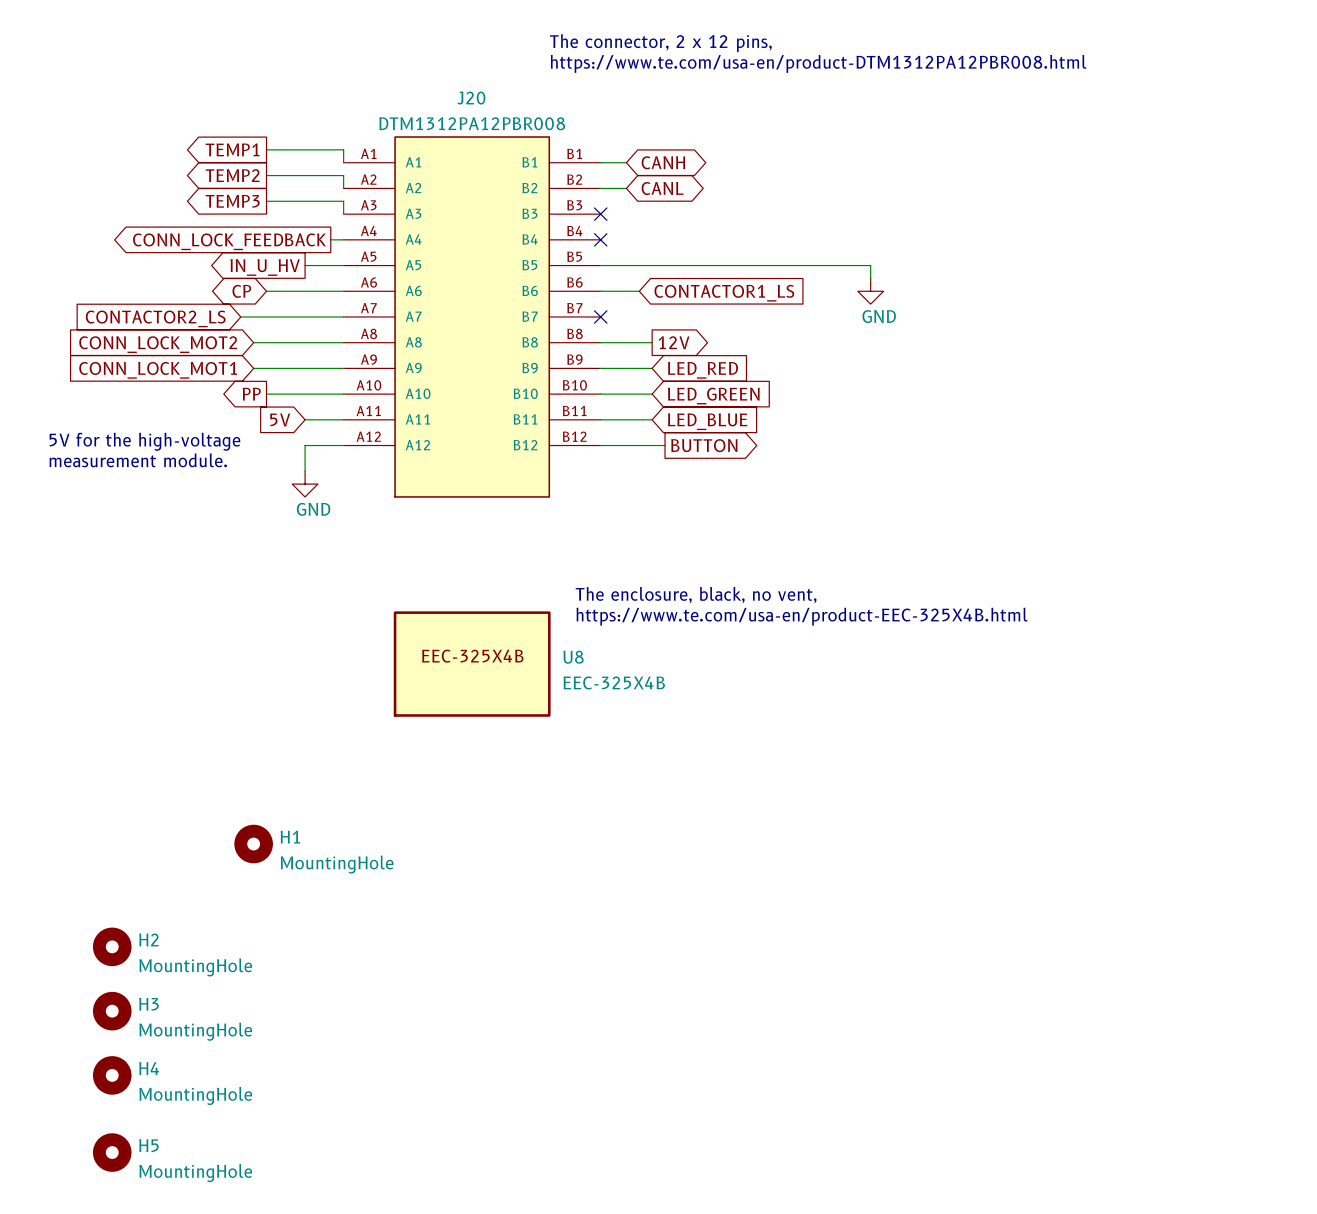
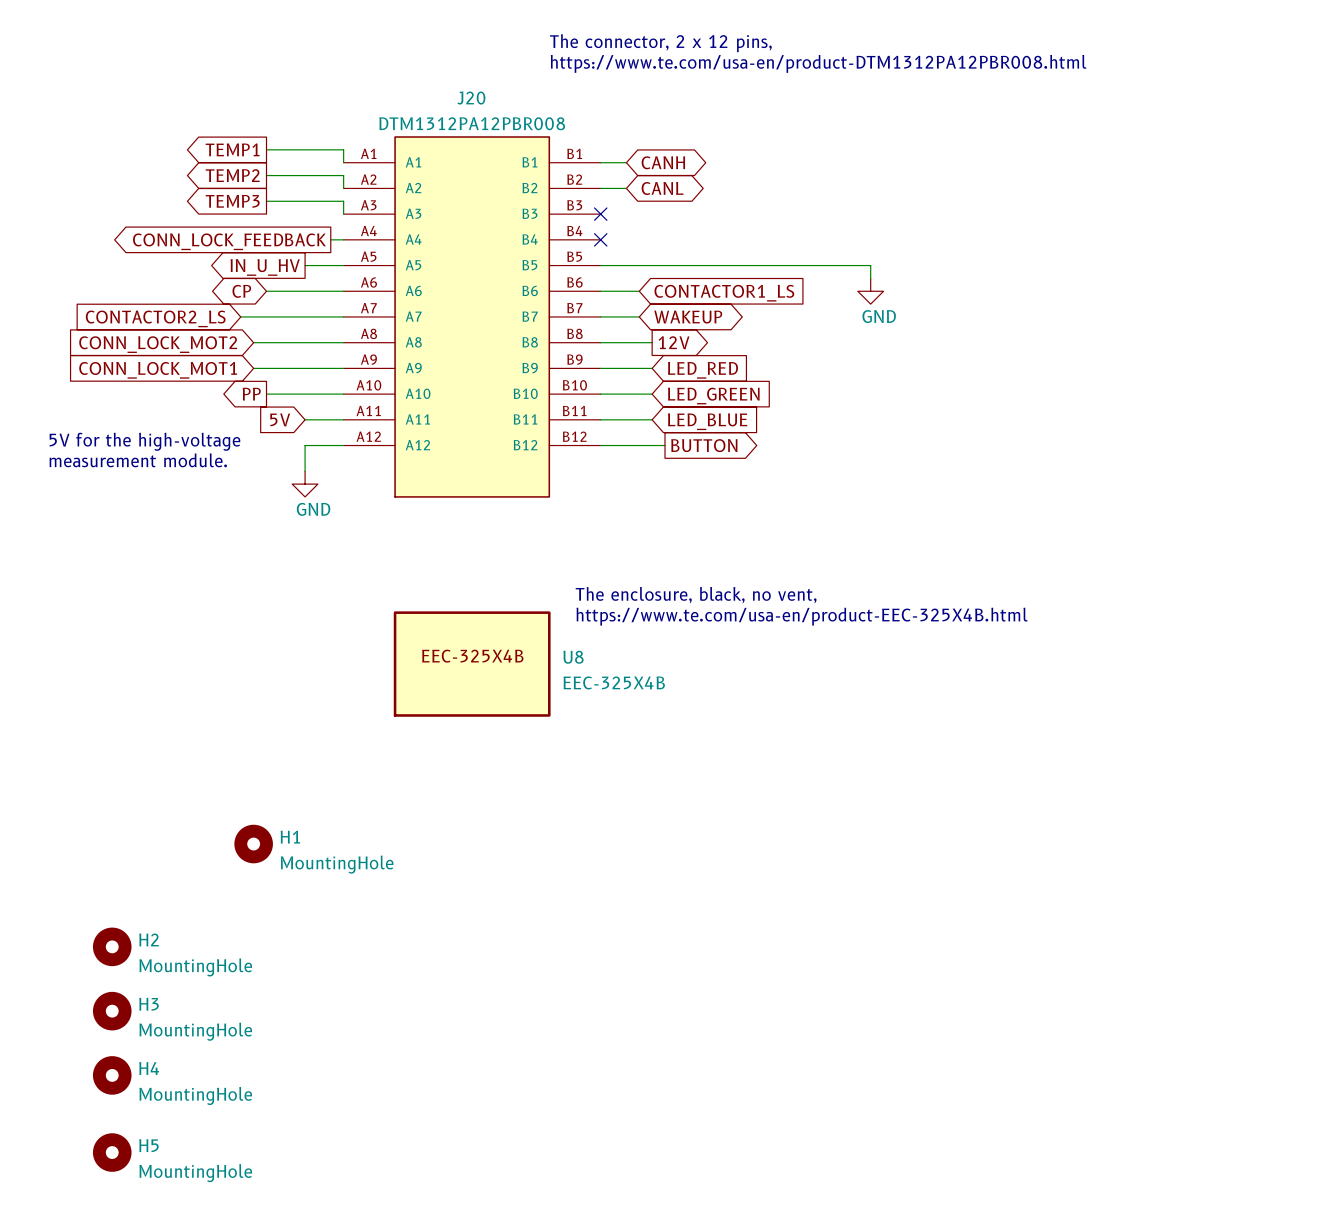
wire: none -> (600, 316) (639, 316)
no-connect mark: (600, 316) -> none
global label: none -> WAKEUP (688, 317)

